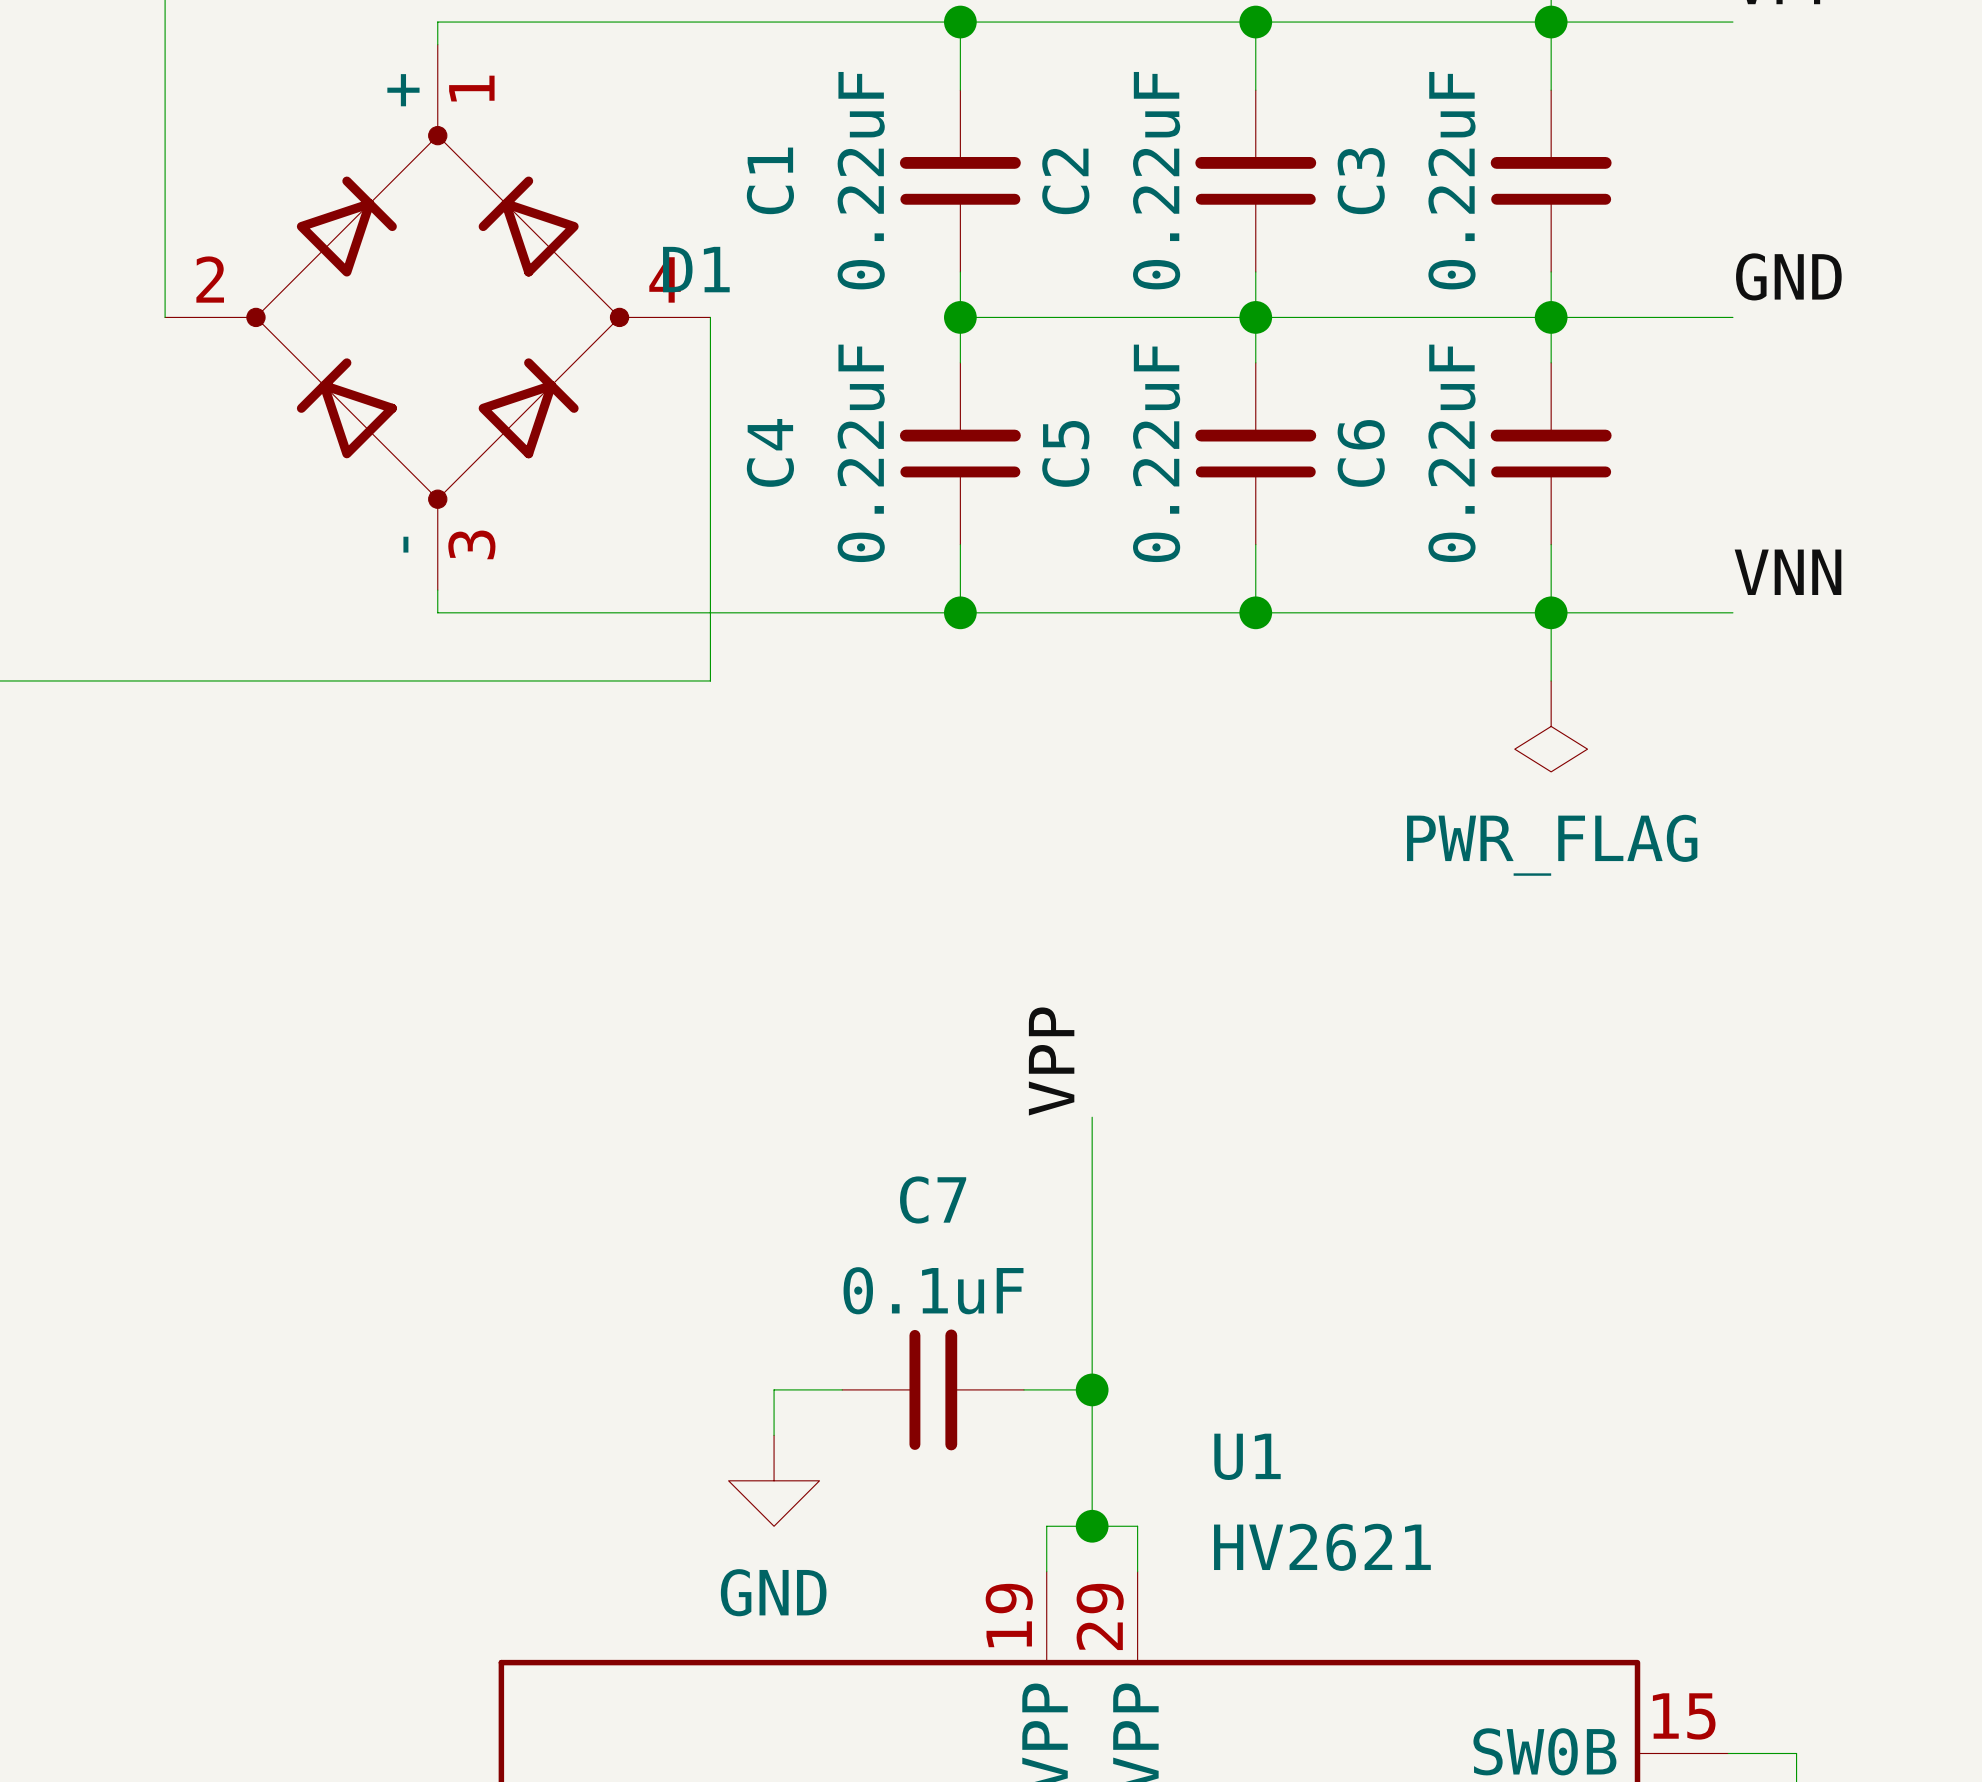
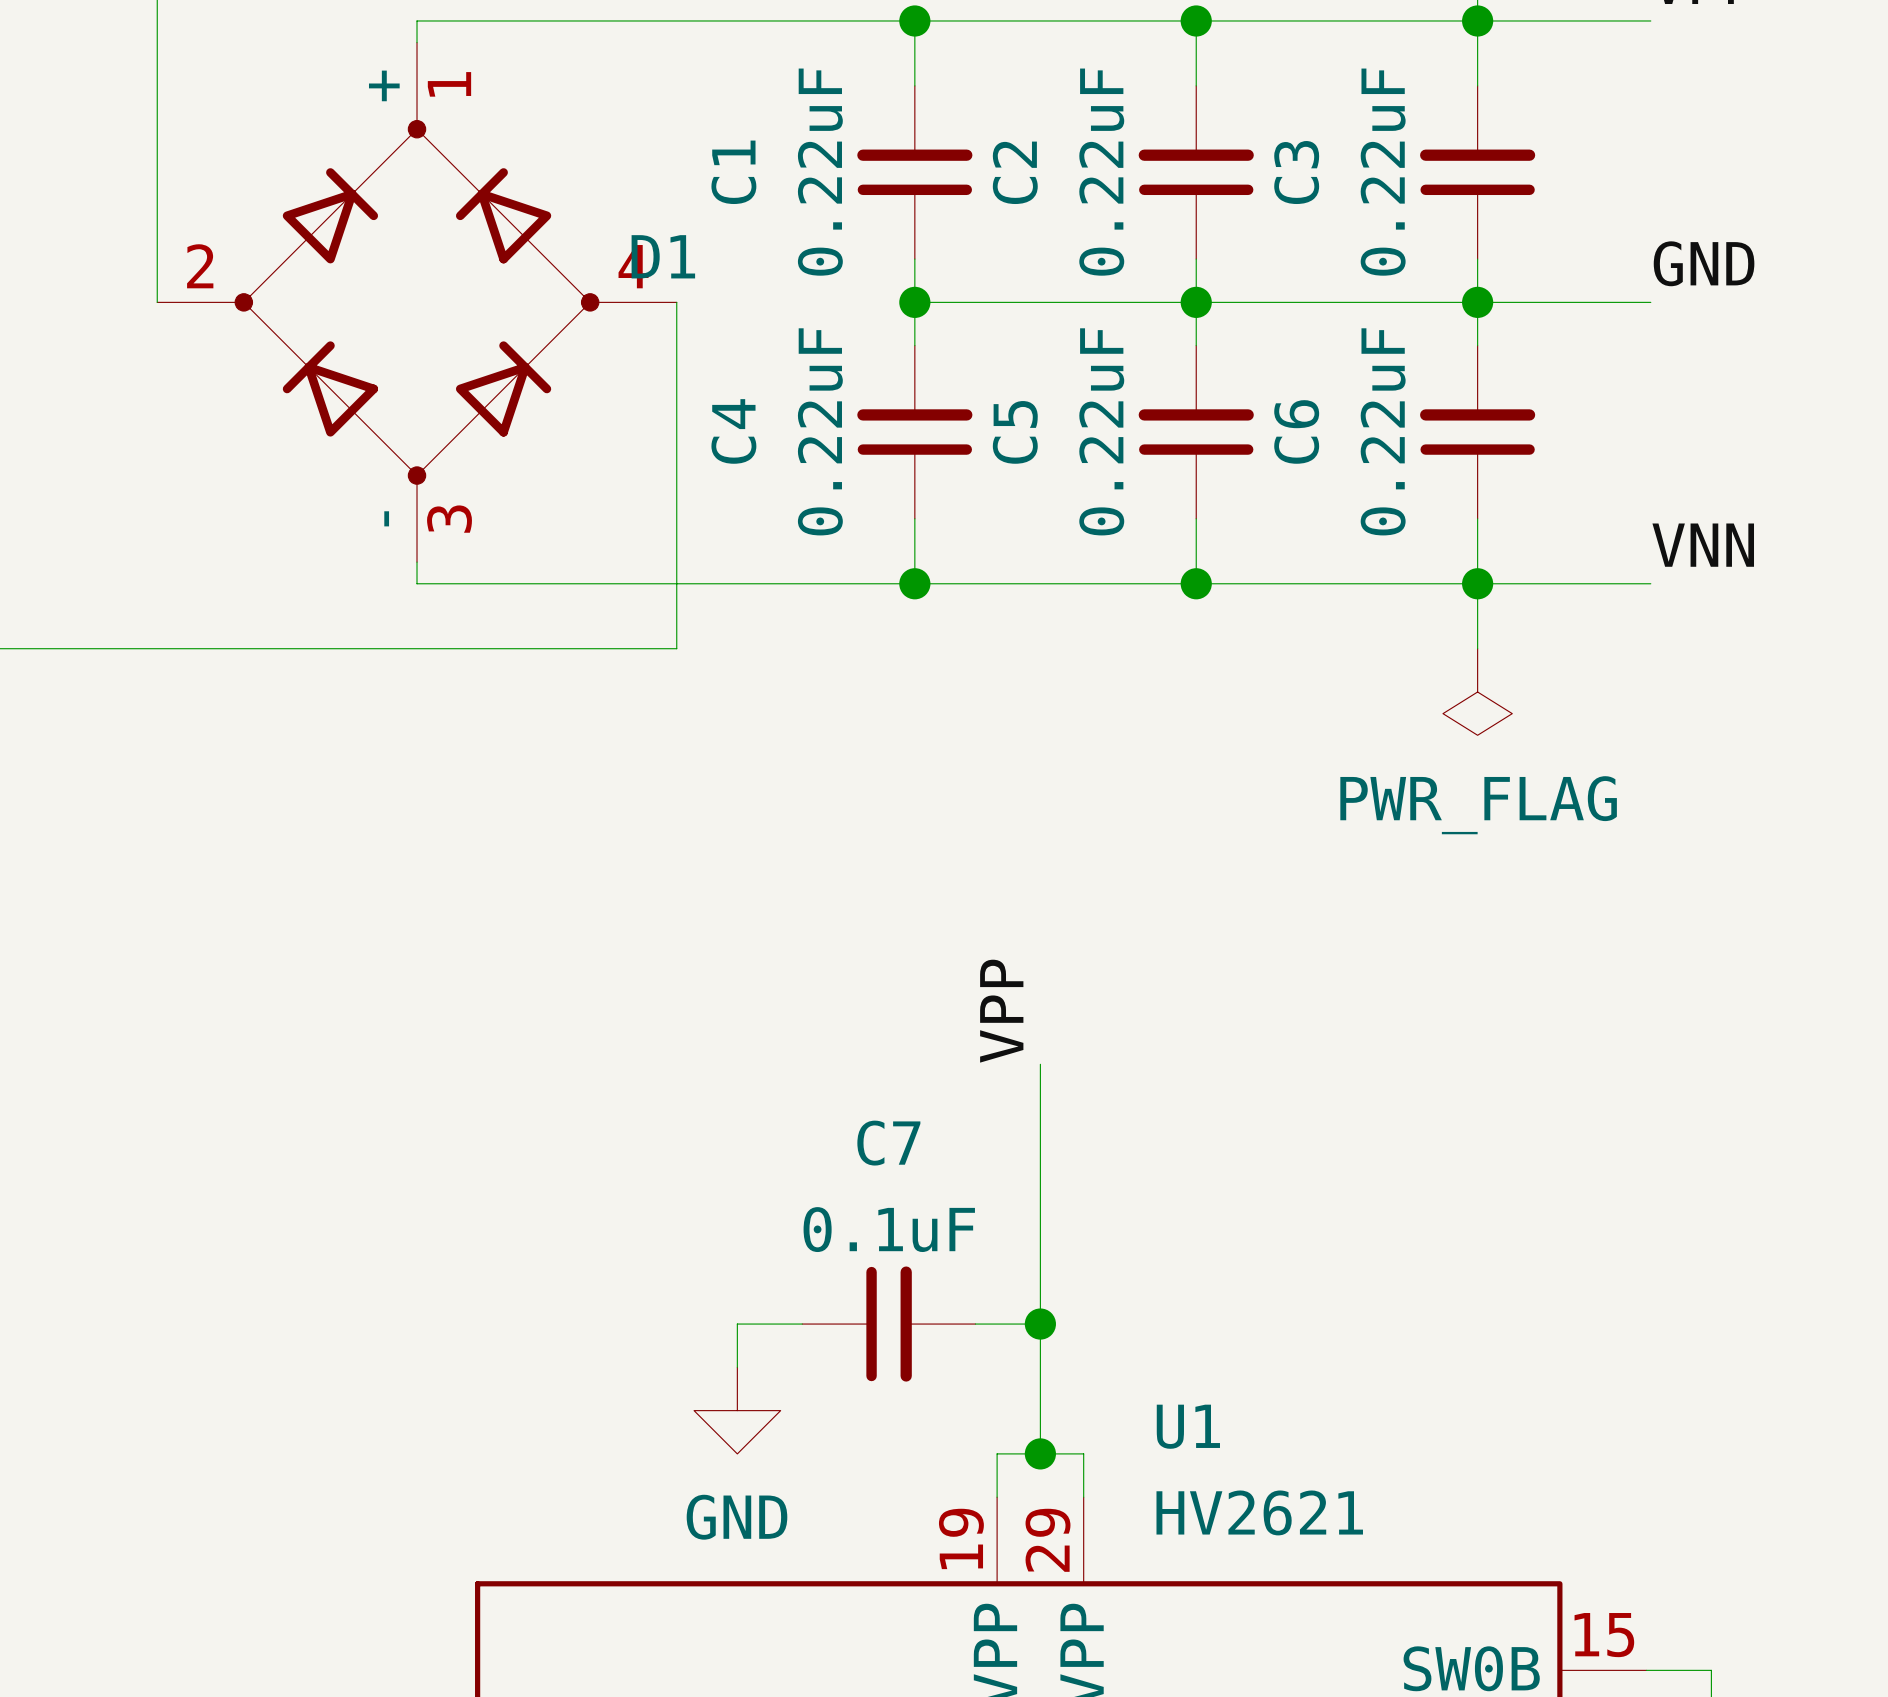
U1 name position: U1 (1247, 1456) -> U1 (1188, 1426)
U1 value position: HV2621 (1322, 1547) -> HV2621 (1259, 1512)

